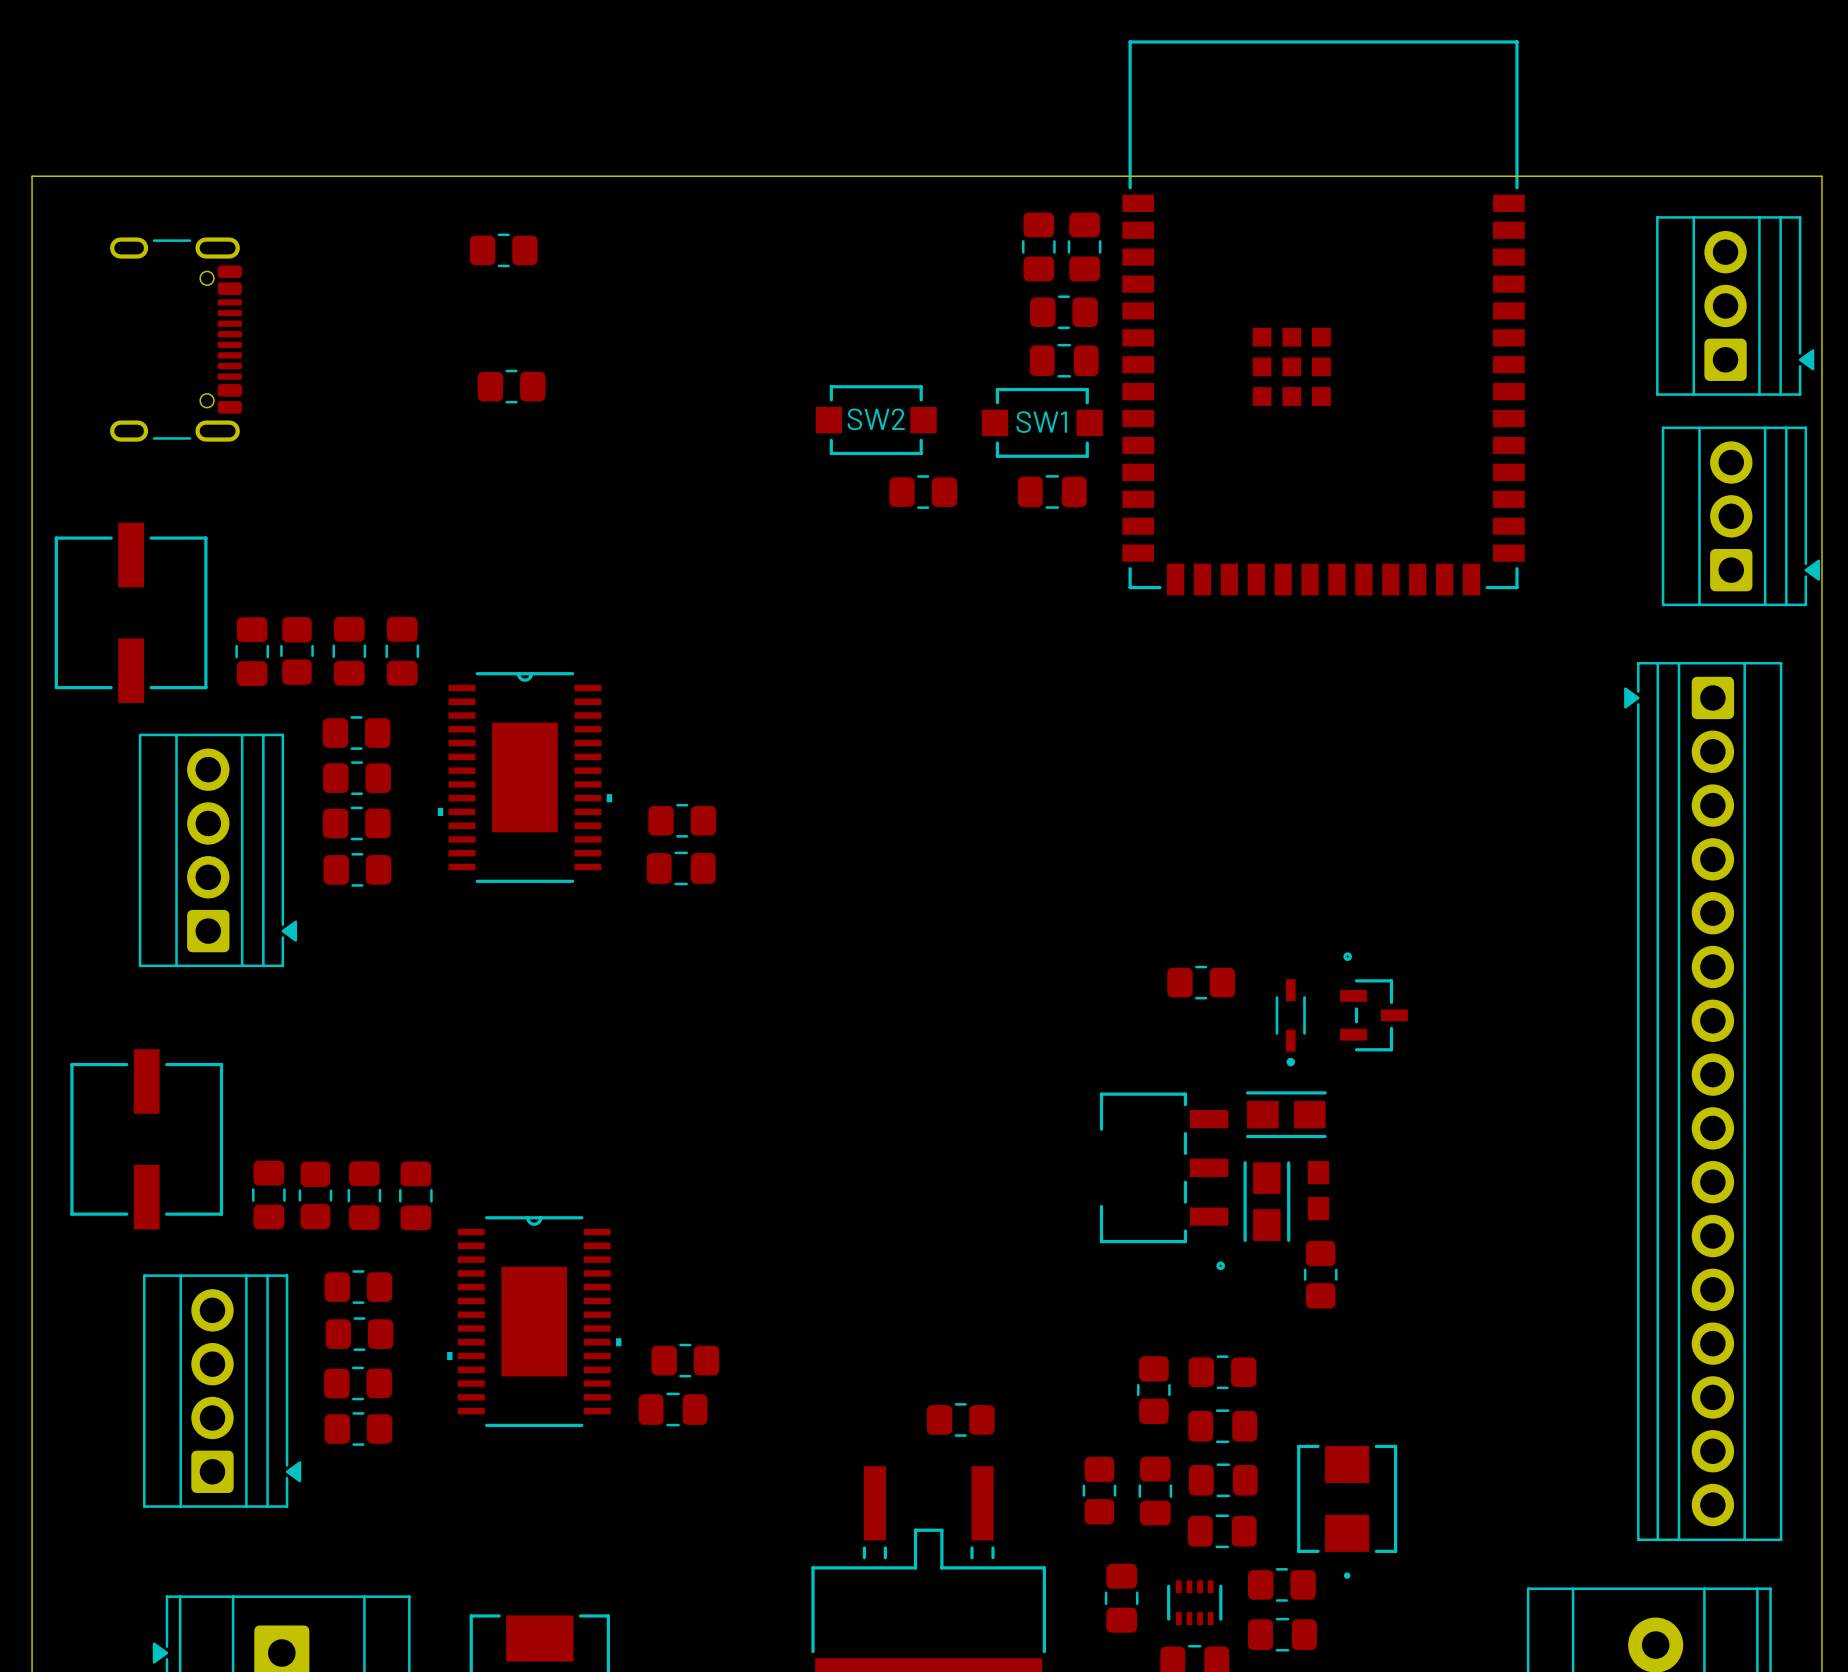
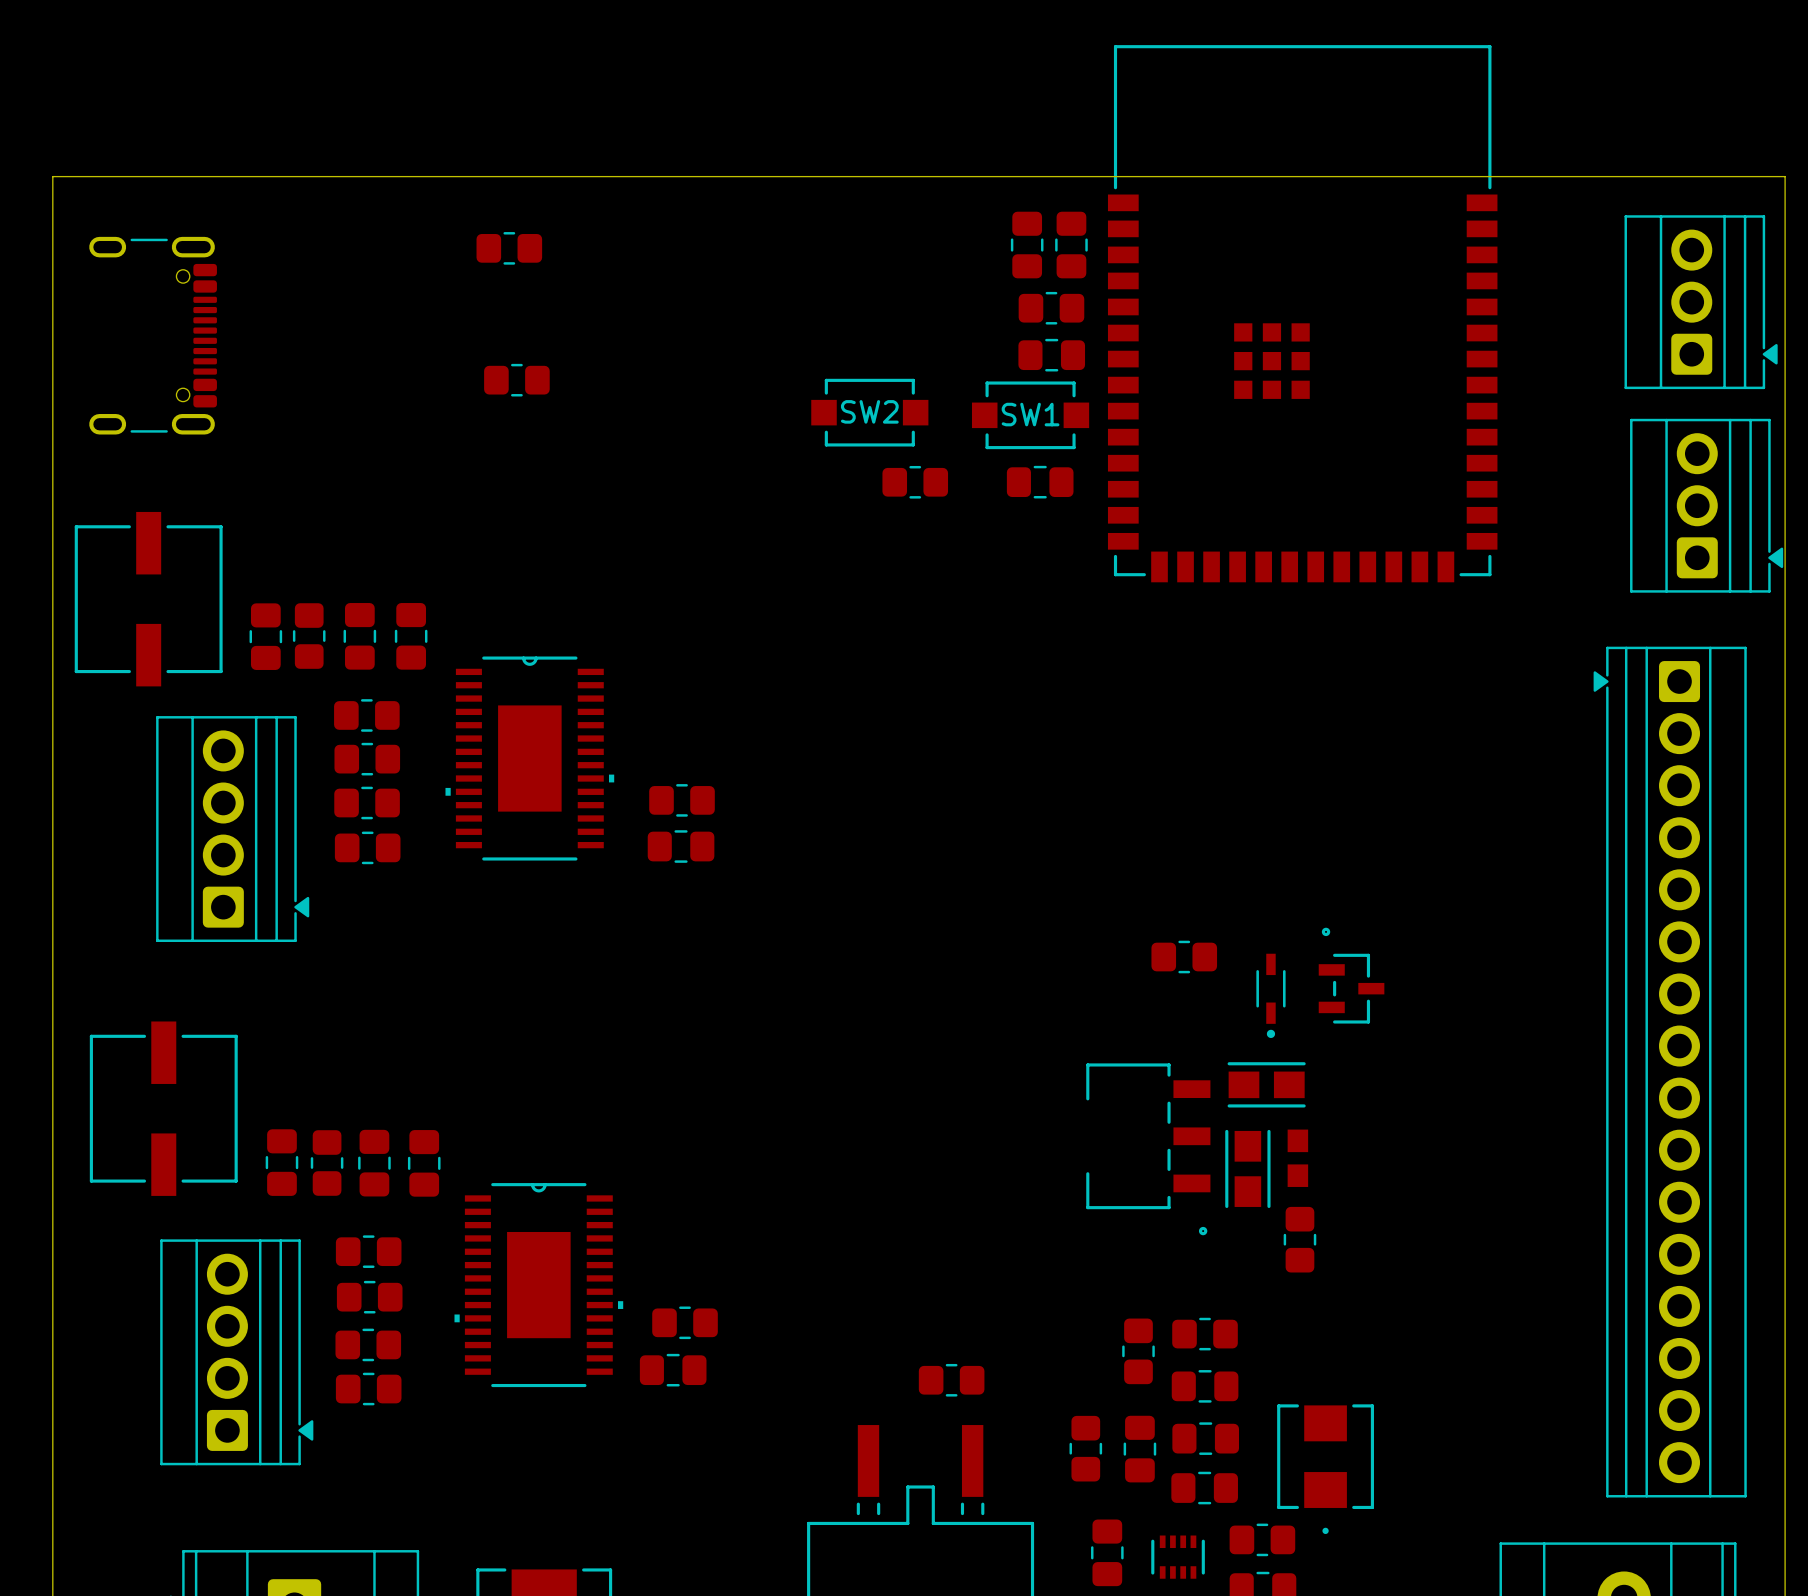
part position: (176, 339) -> (153, 335)

